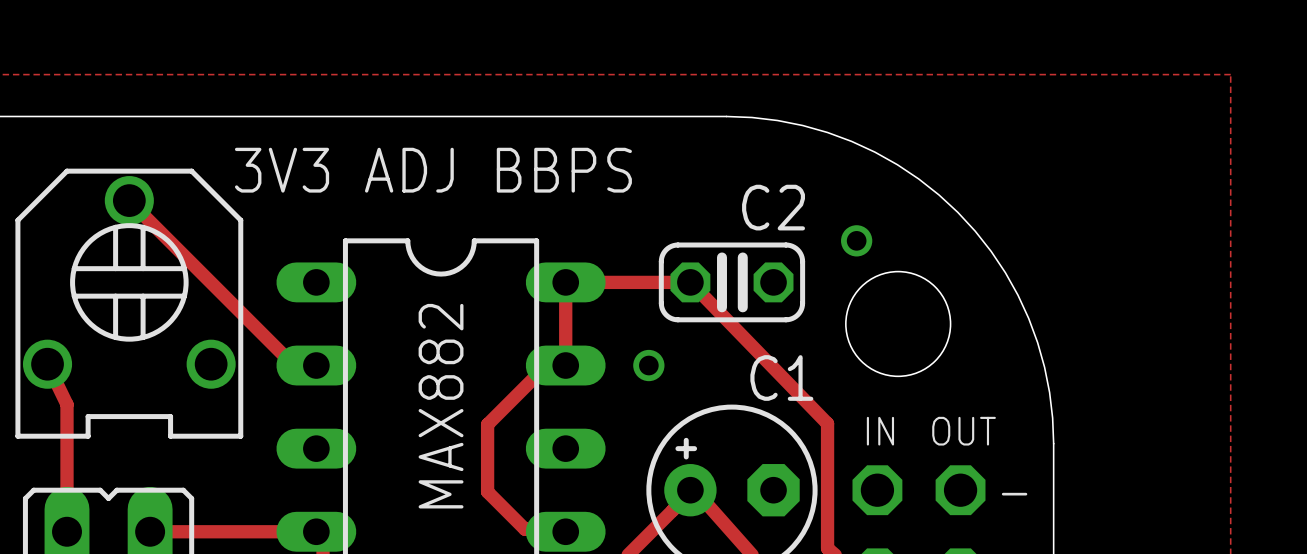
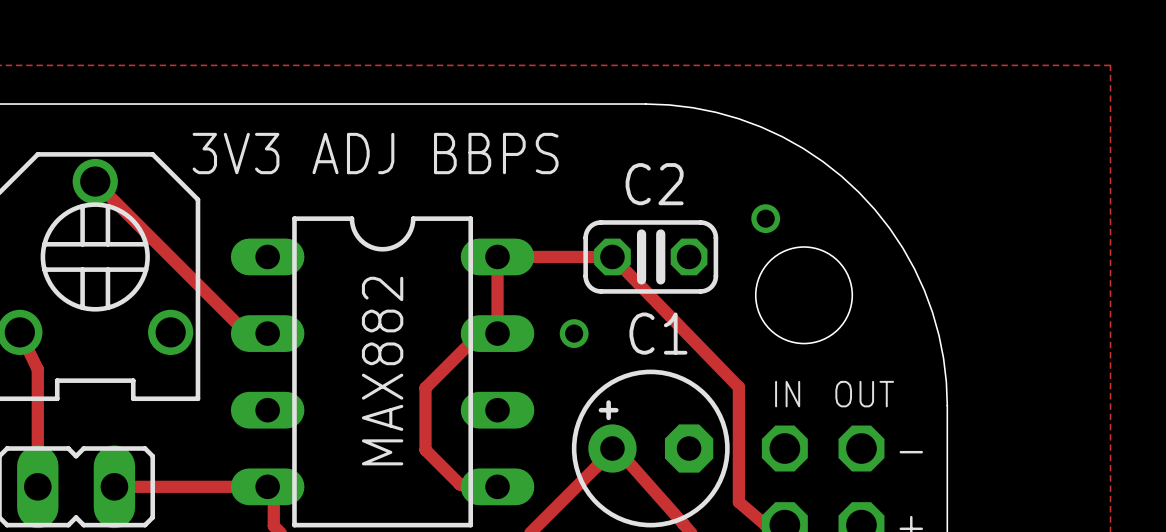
C2 name position: C2 (773, 207) -> C2 (654, 184)
C1 name position: C1 (781, 377) -> C1 (658, 333)

